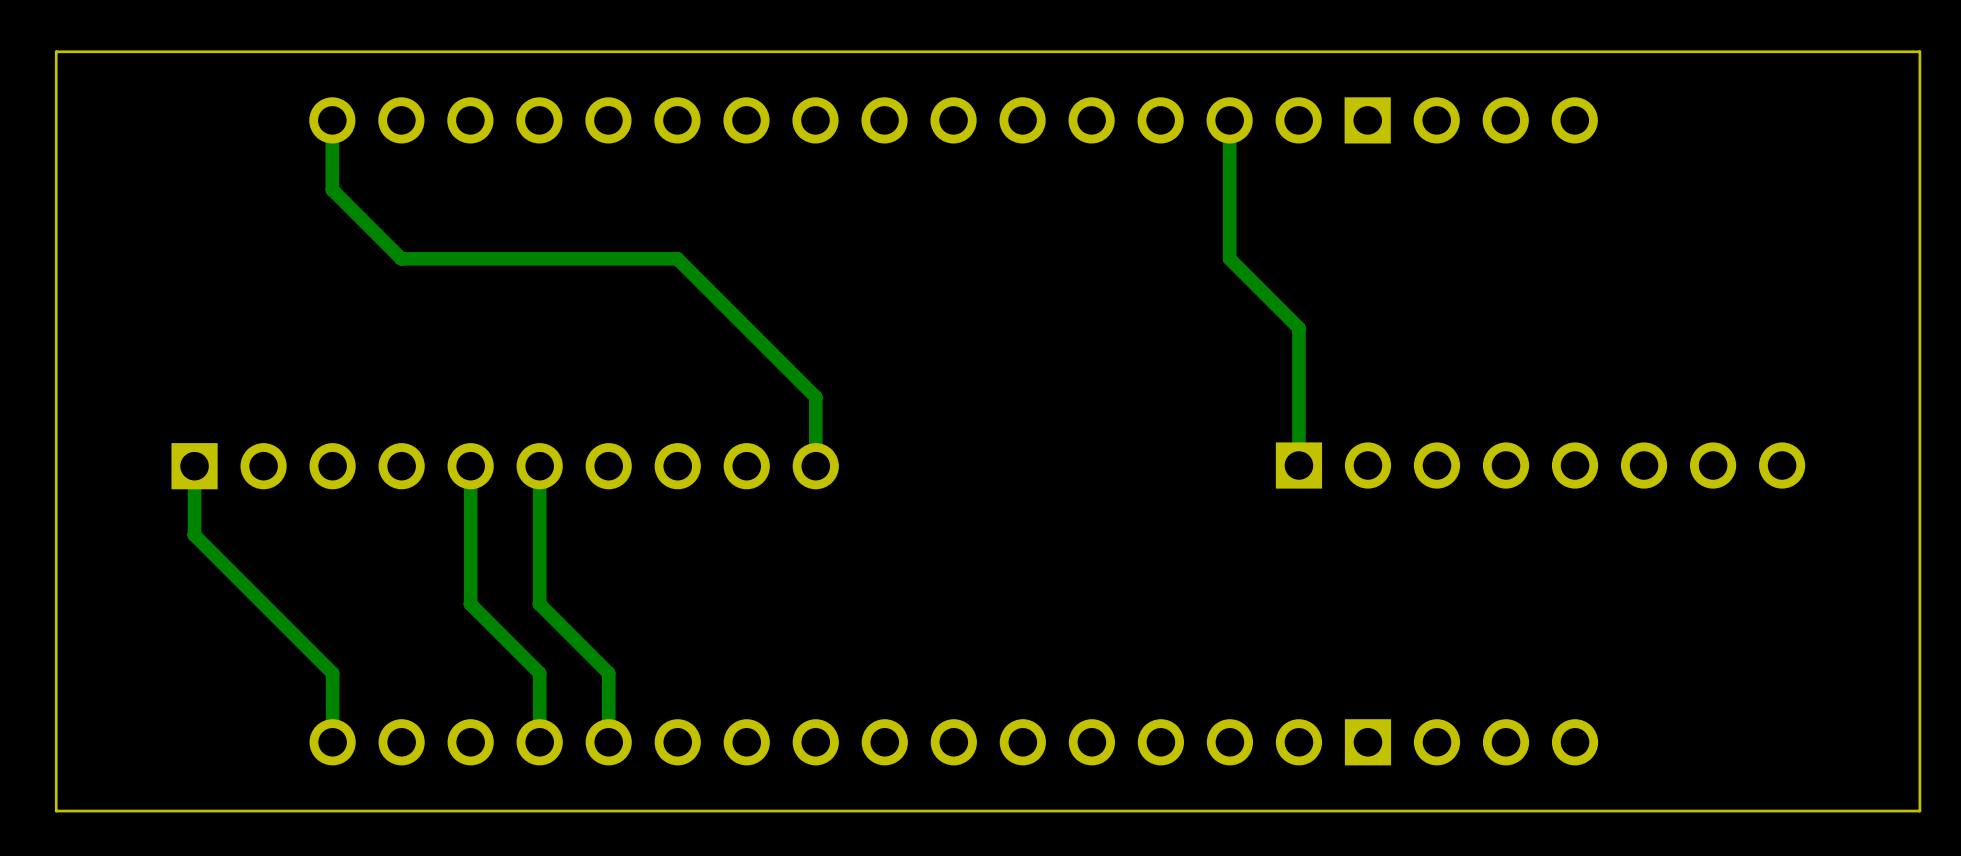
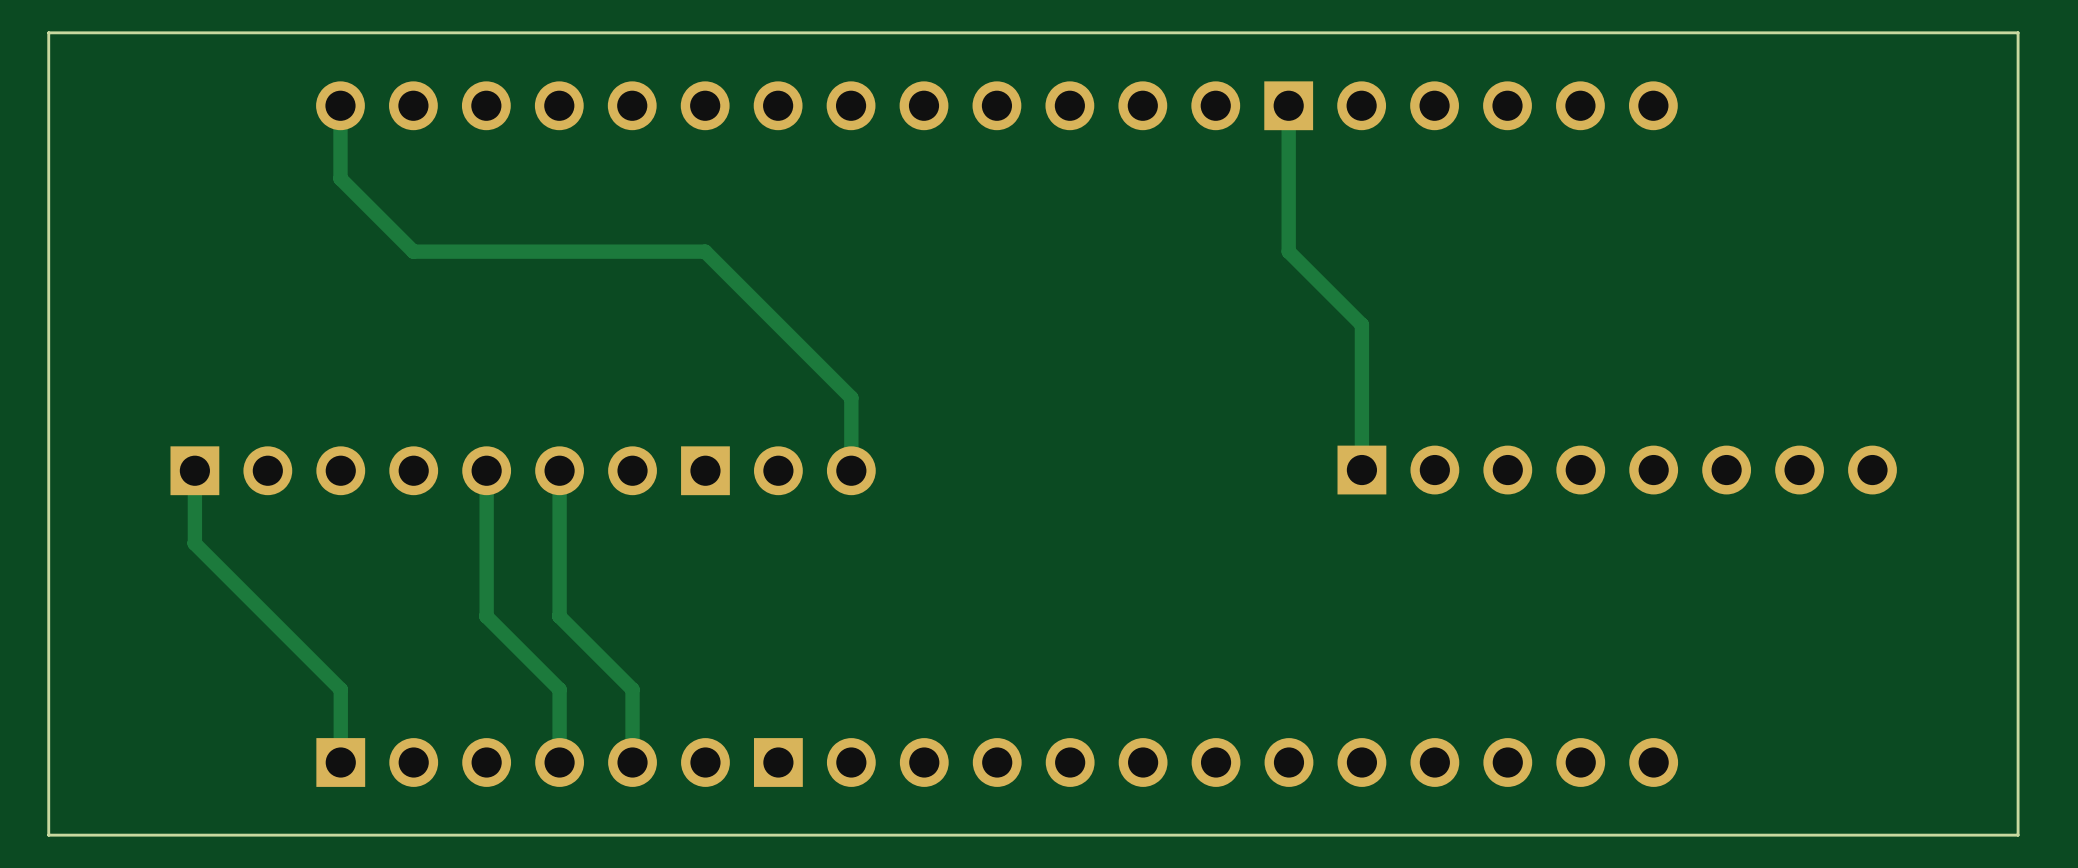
part footprint: [309, 97, 1598, 144] -> [316, 81, 1678, 131]
part footprint: [171, 443, 839, 490] -> [170, 446, 876, 496]
part footprint: [309, 719, 1599, 766] -> [316, 738, 1679, 787]

